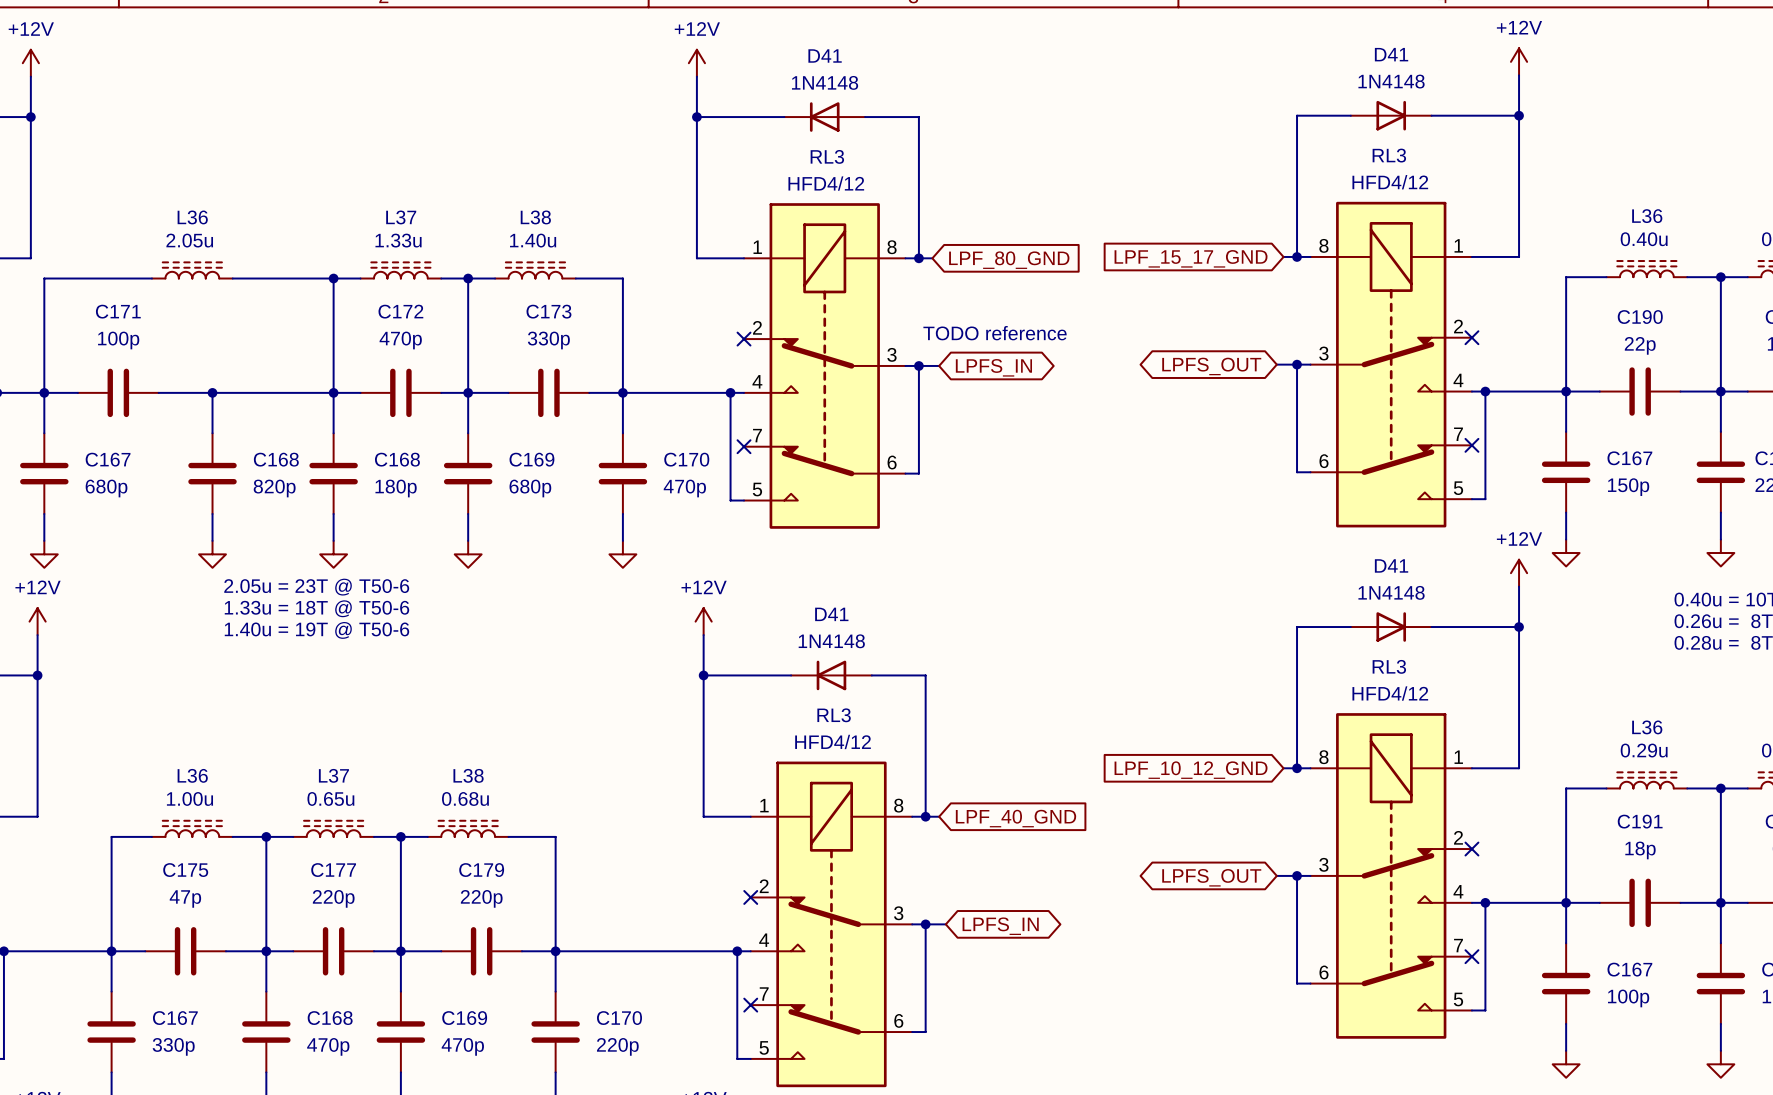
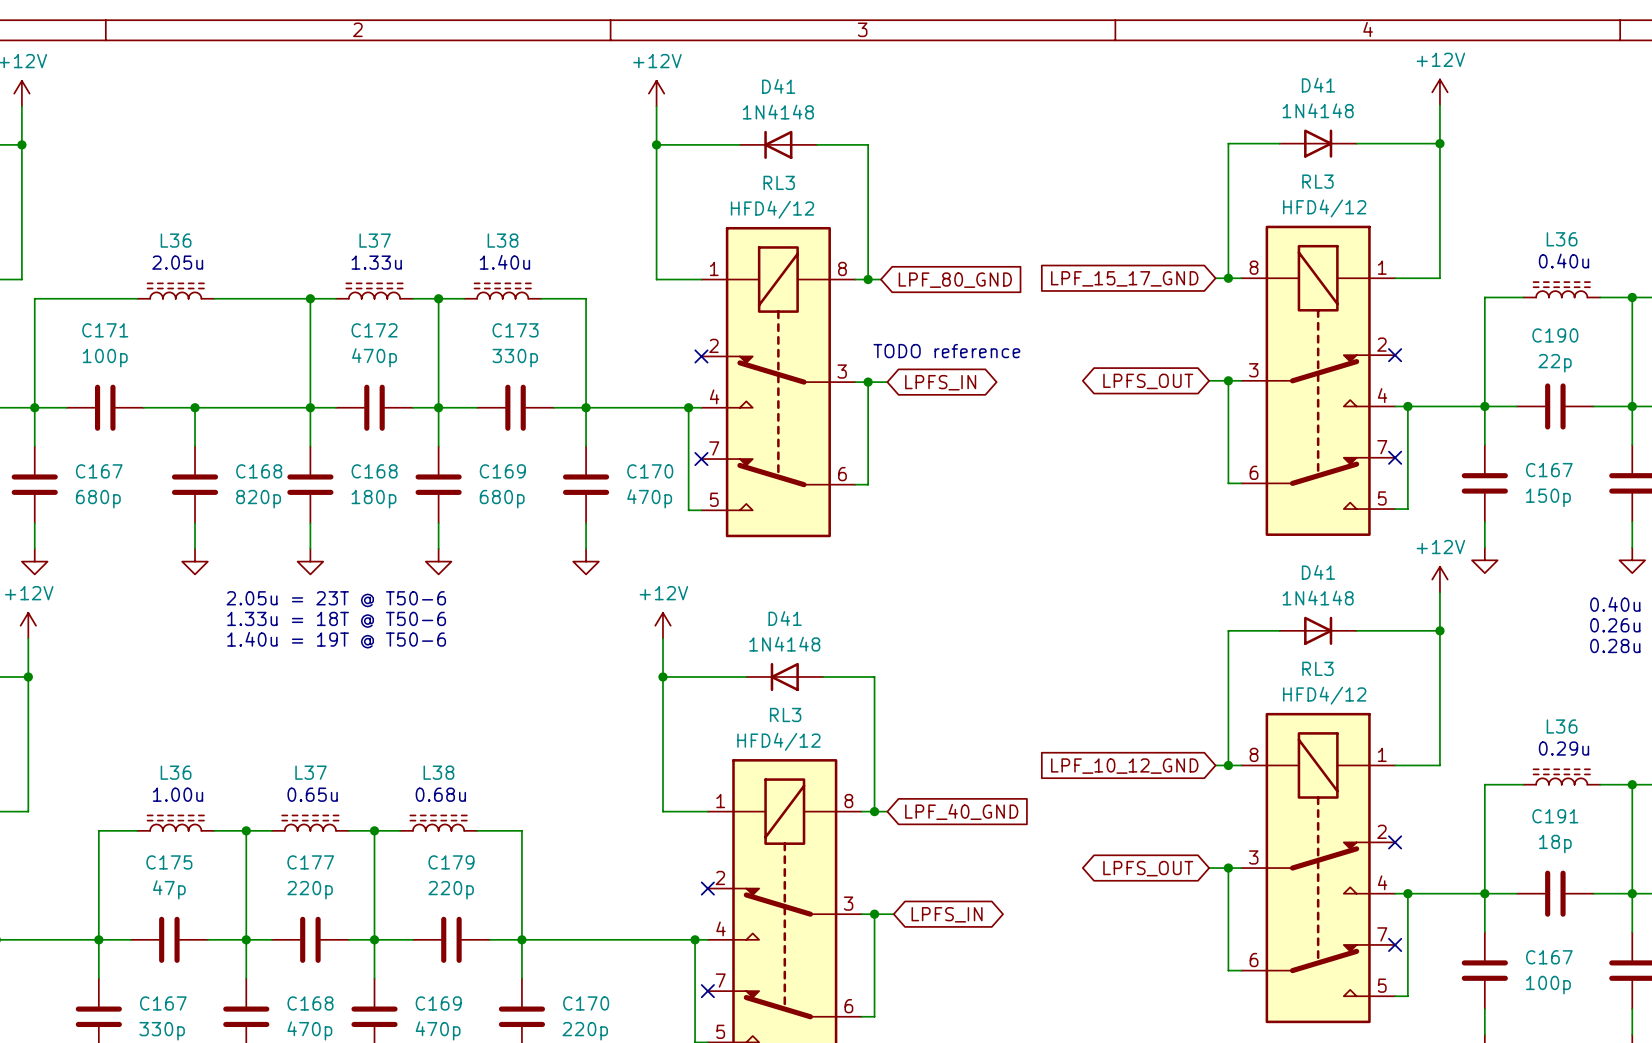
text position: 2.05u = 23T @ T50-6 (316, 587) -> 2.05u = 23T @ T50-6 (336, 599)
text position: 1.33u = 18T @ T50-6 (316, 608) -> 1.33u = 18T @ T50-6 (336, 619)
text position: 1.40u = 19T @ T50-6 (316, 630) -> 1.40u = 19T @ T50-6 (336, 640)

